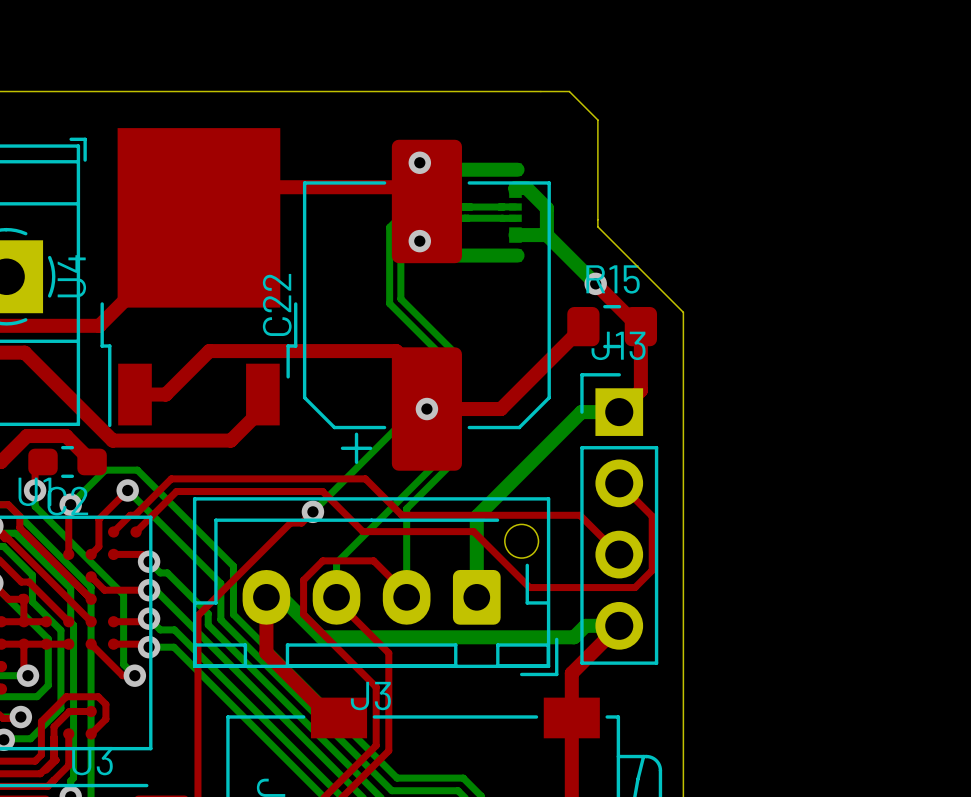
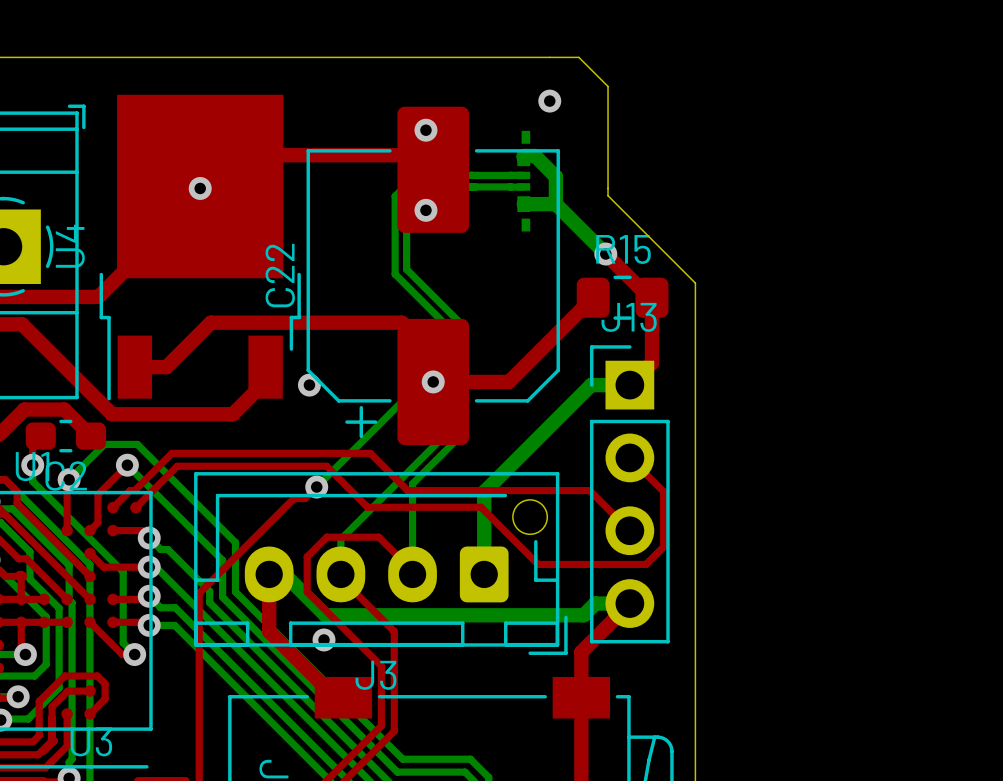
via: none -> (549, 101)
bottom track: (426, 169) (517, 169) -> none
via: none -> (200, 188)
bottom track: (419, 241) (434, 255) (517, 255) -> none
via: none -> (309, 385)
via: none -> (324, 639)

